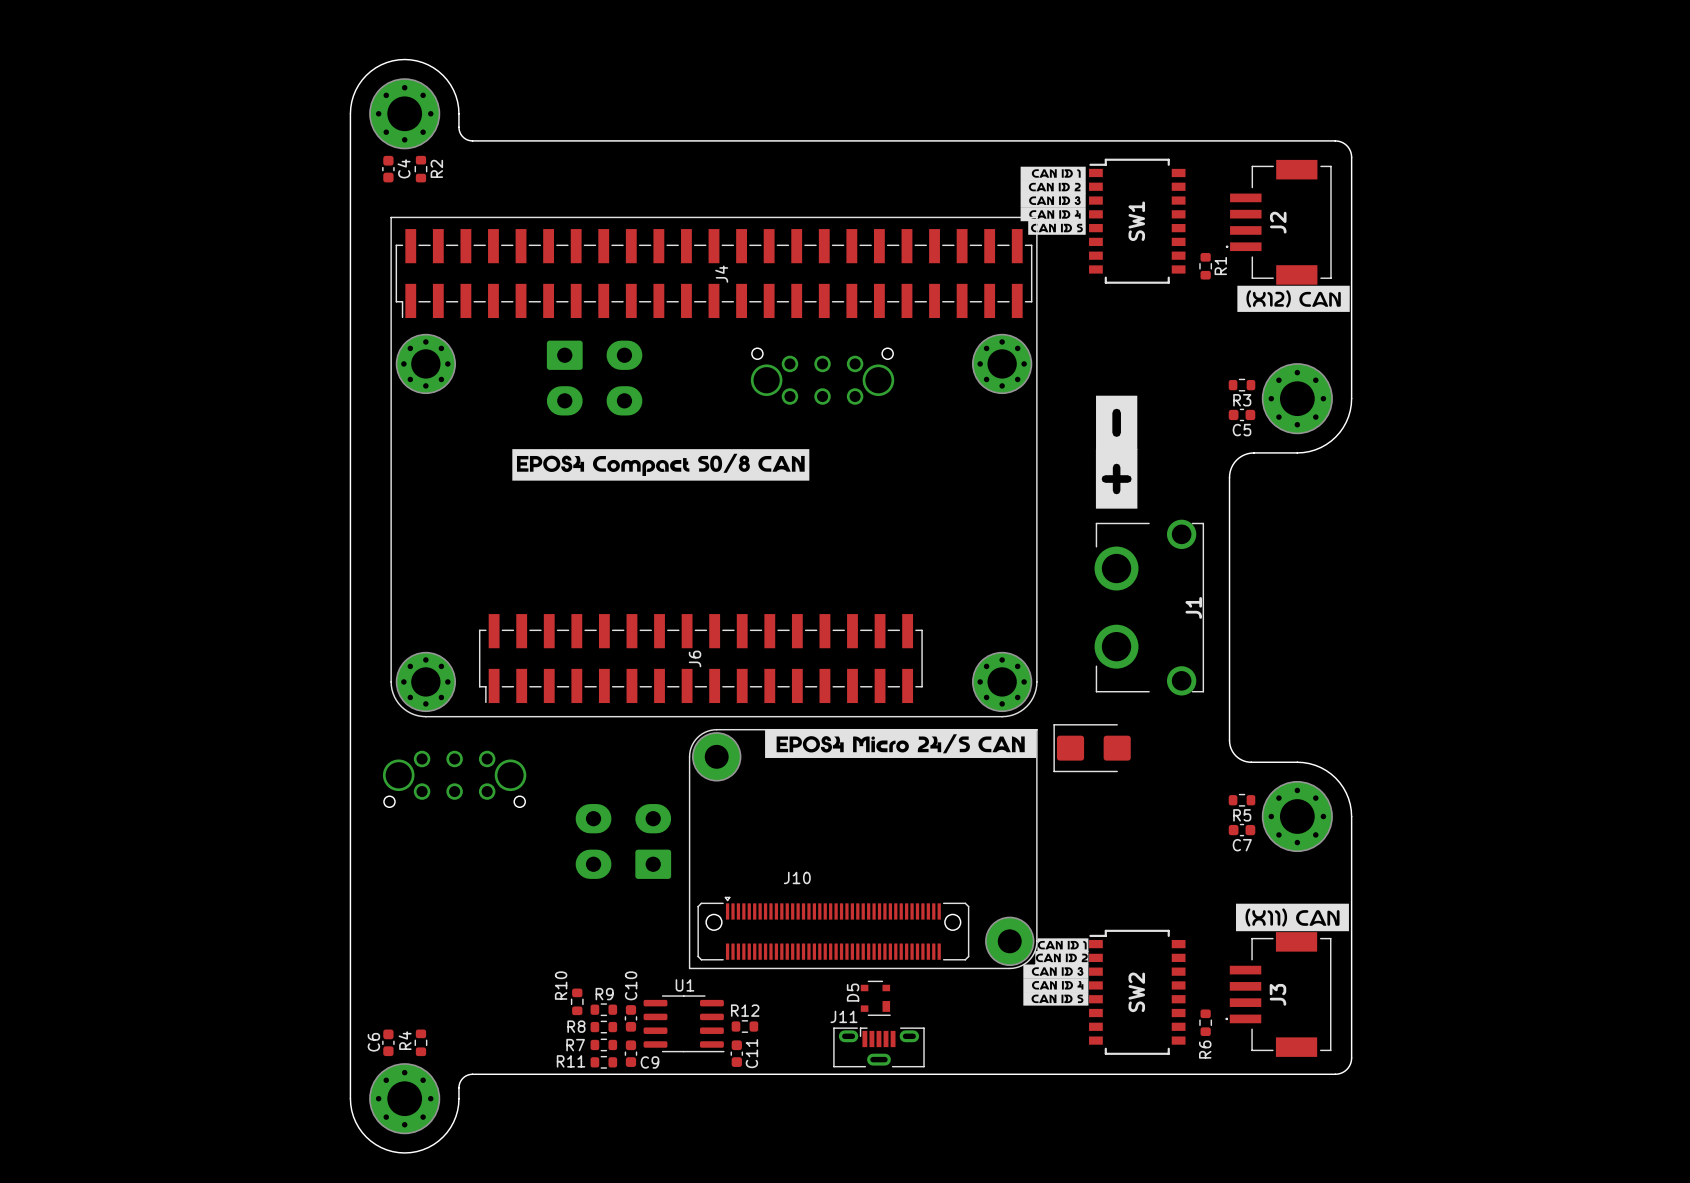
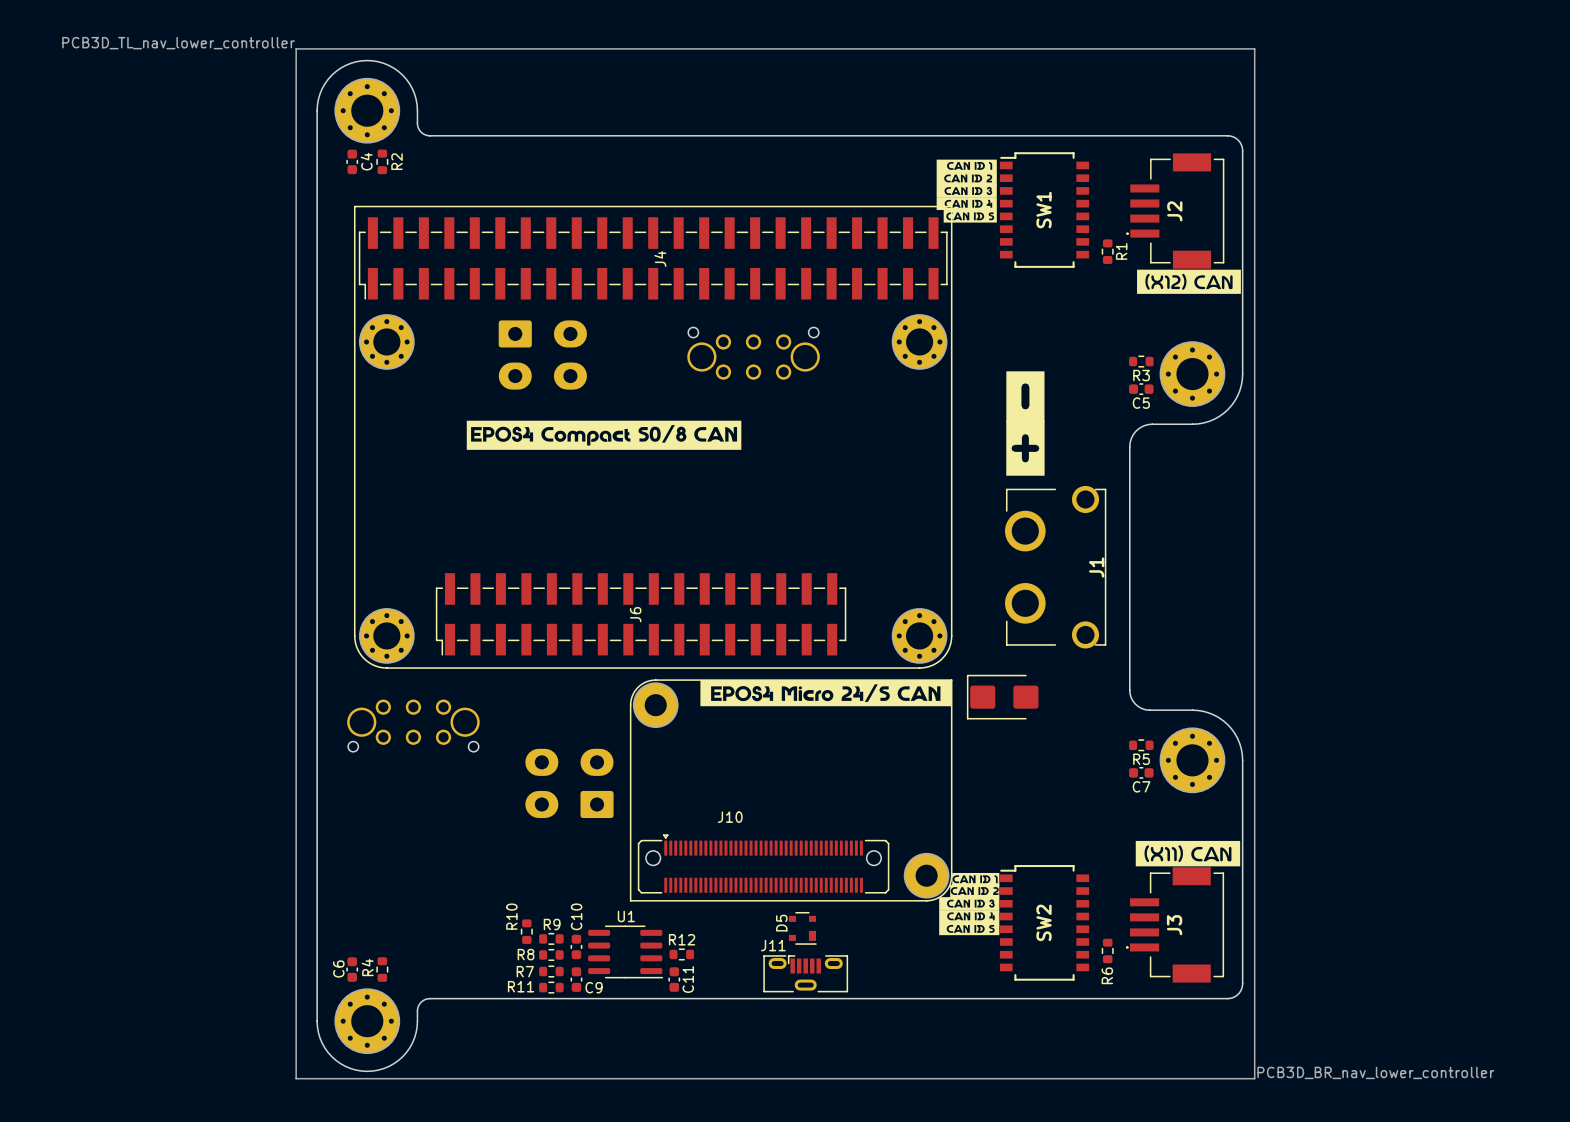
text: none -> PCB3D_TL_nav_lower_controller (178, 43)
line: none -> (296, 48) (1254, 48) (1254, 1078) (296, 1078) (296, 48)
text: none -> PCB3D_BR_nav_lower_controller (1375, 1072)

